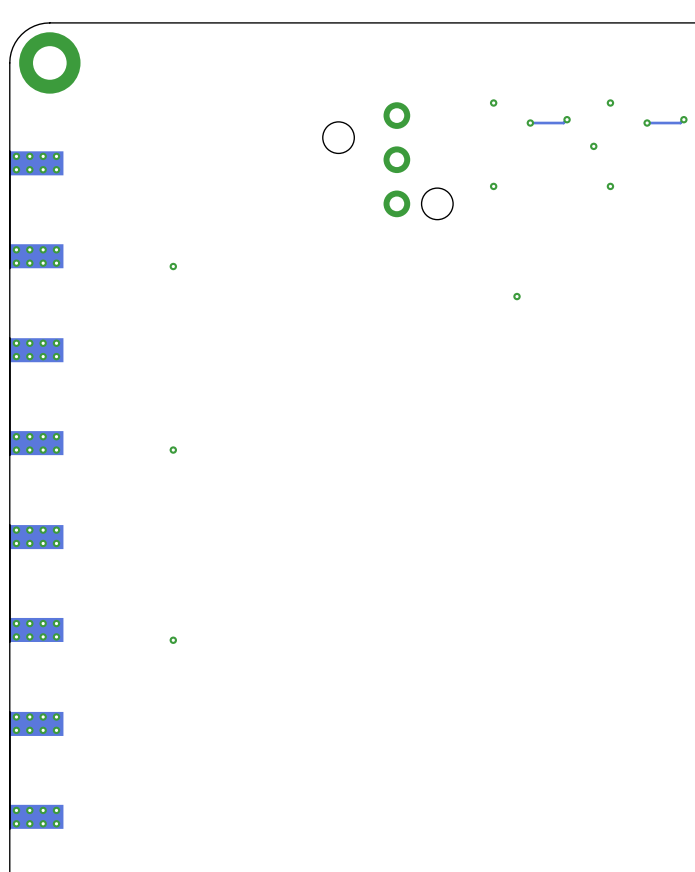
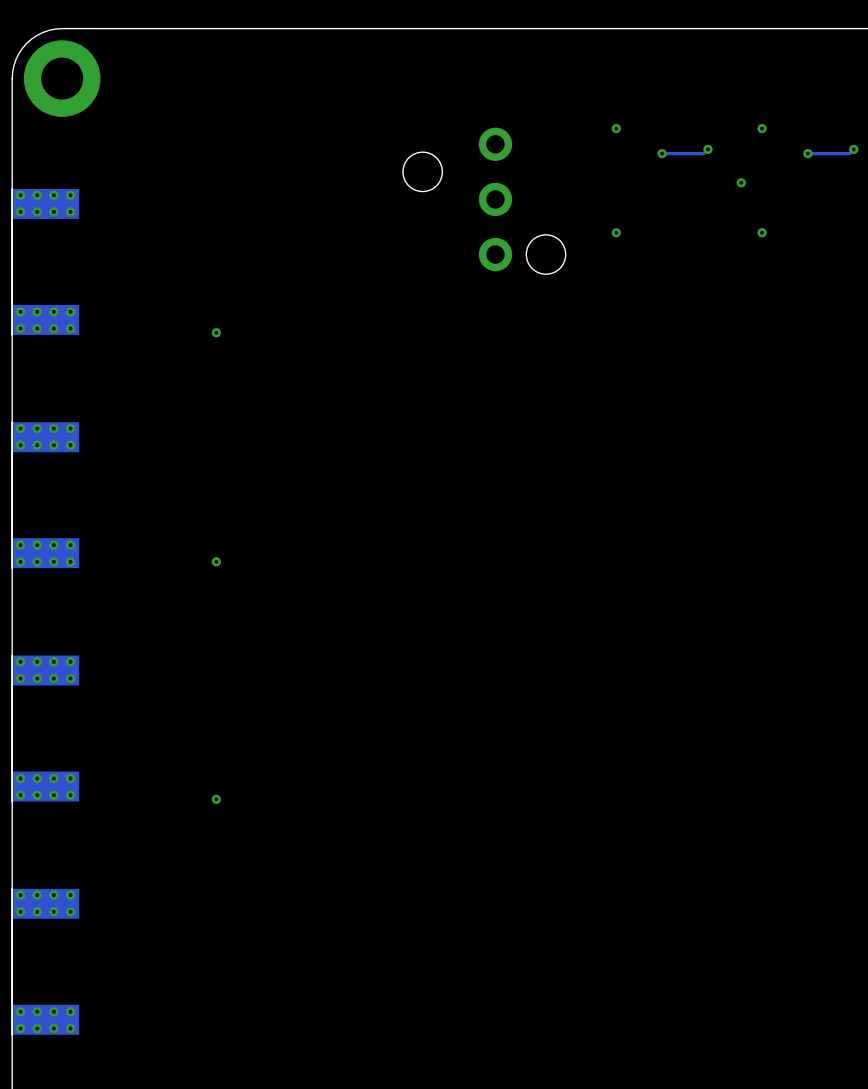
via: (517, 296) -> none

